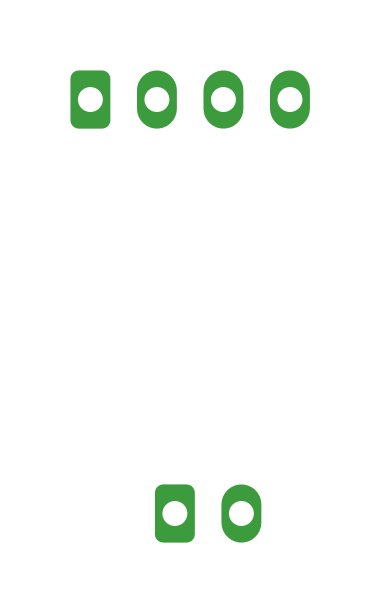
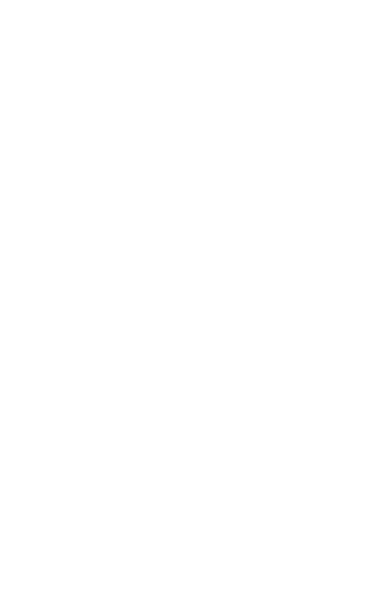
part: (190, 99) -> none
part: (208, 513) -> none

